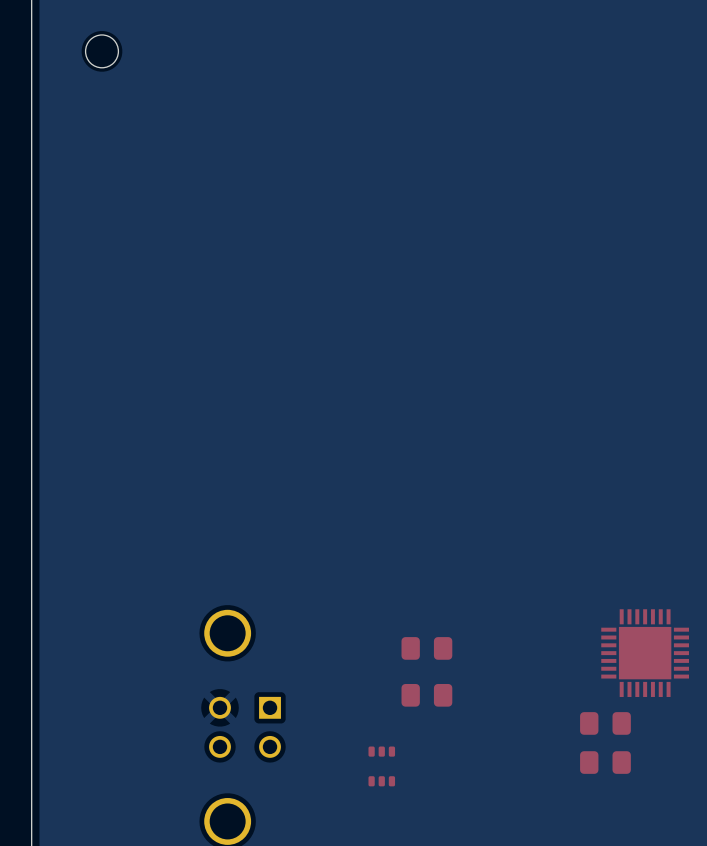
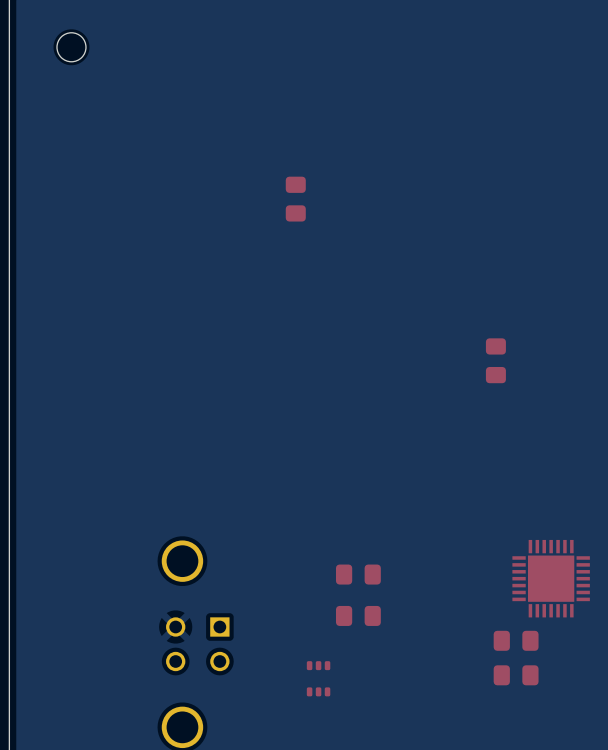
part: none -> (295, 199)
part: none -> (495, 360)

